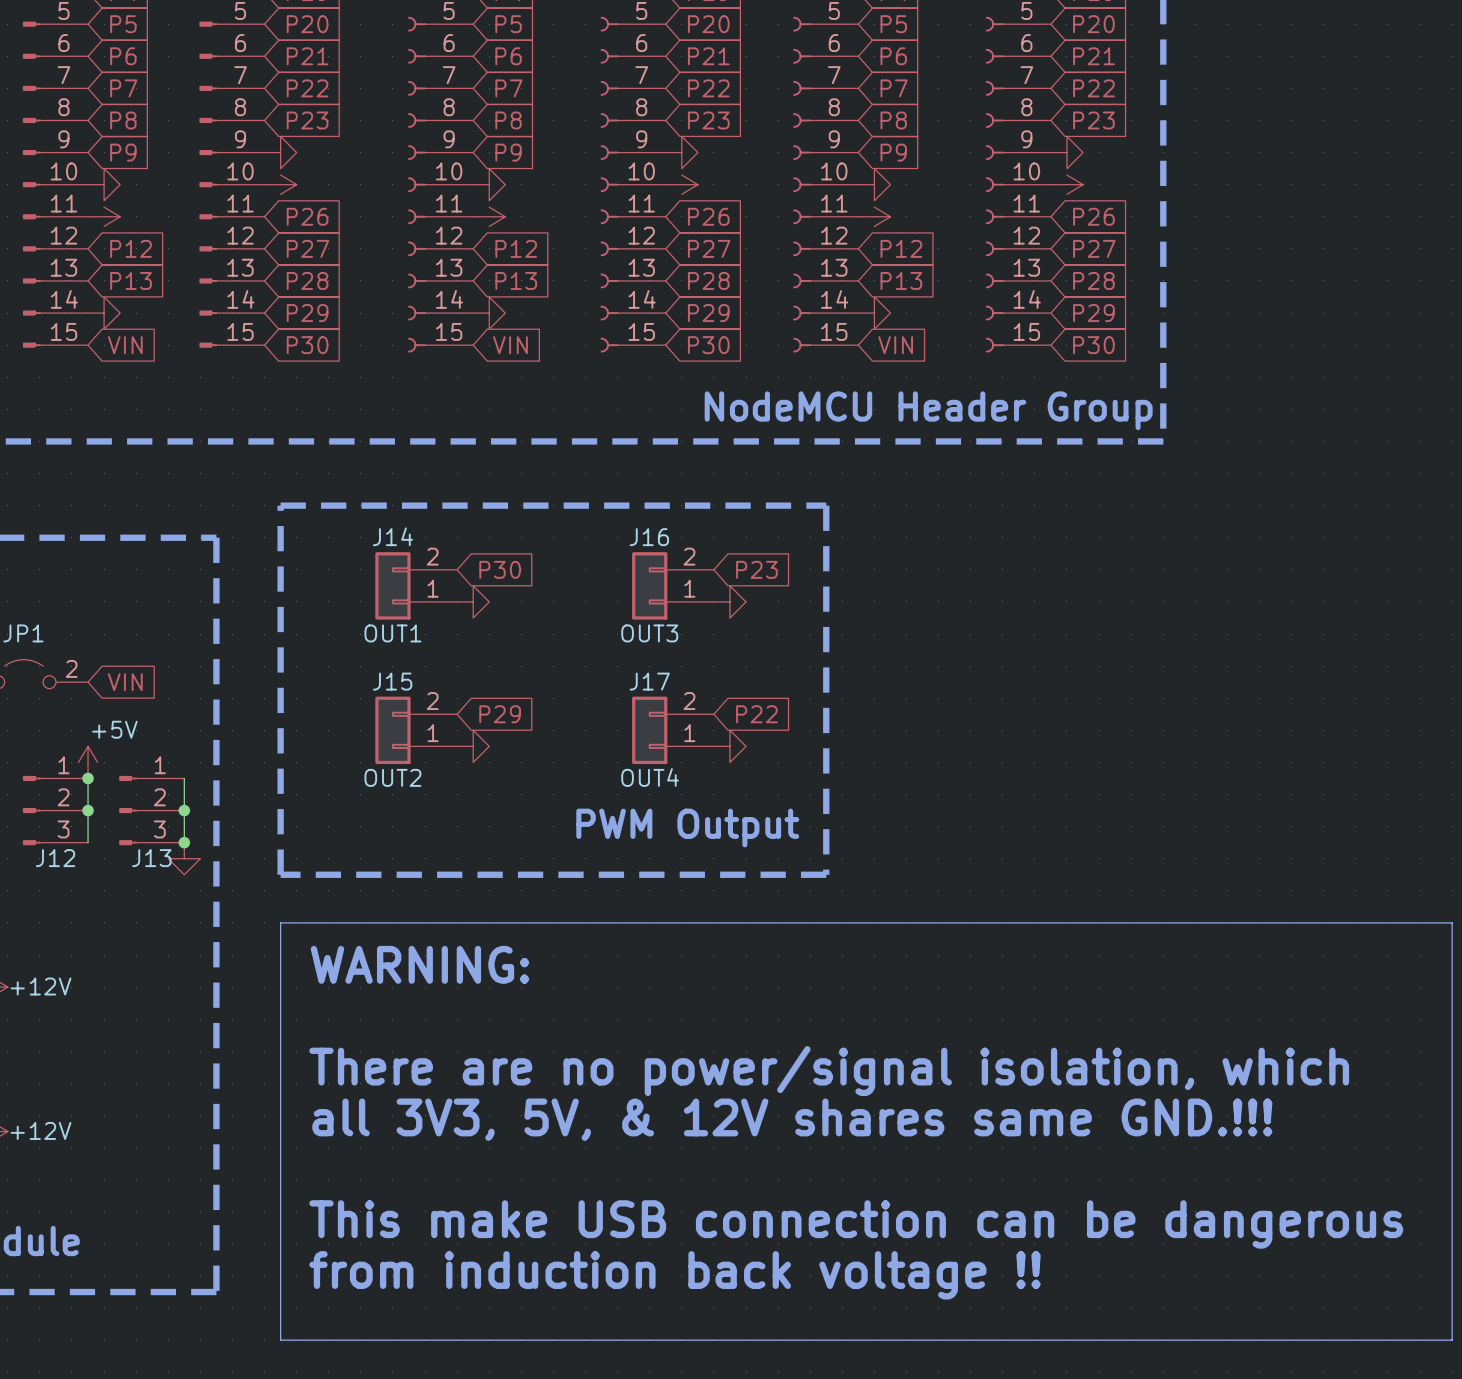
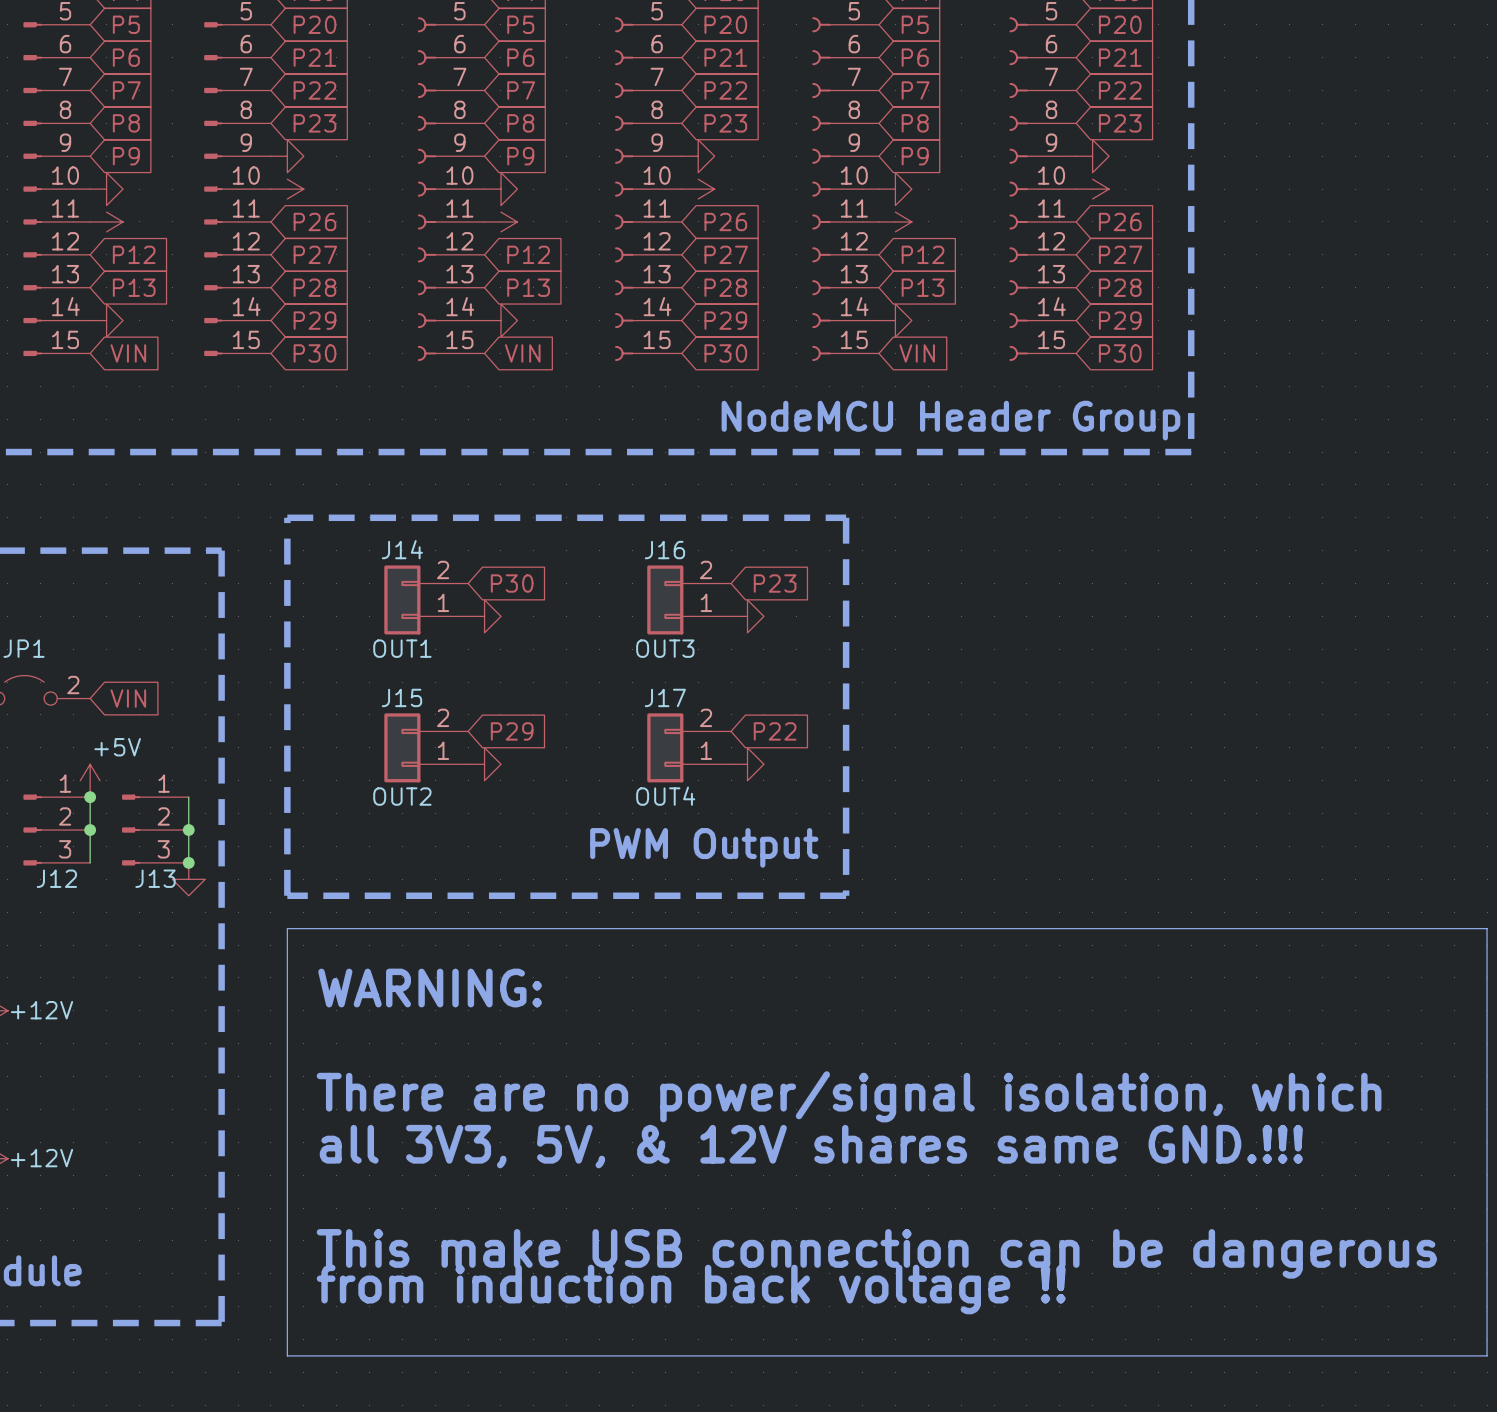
line: (280, 922) (1452, 922) -> (287, 945) (287, 928) (1487, 928) (1487, 945)
text position: from induction back voltage !! (674, 1275) -> from induction back voltage !! (691, 1289)
line: (280, 1324) (280, 1340) (1452, 1340) (1452, 1324) -> (287, 1355) (1487, 1355)

